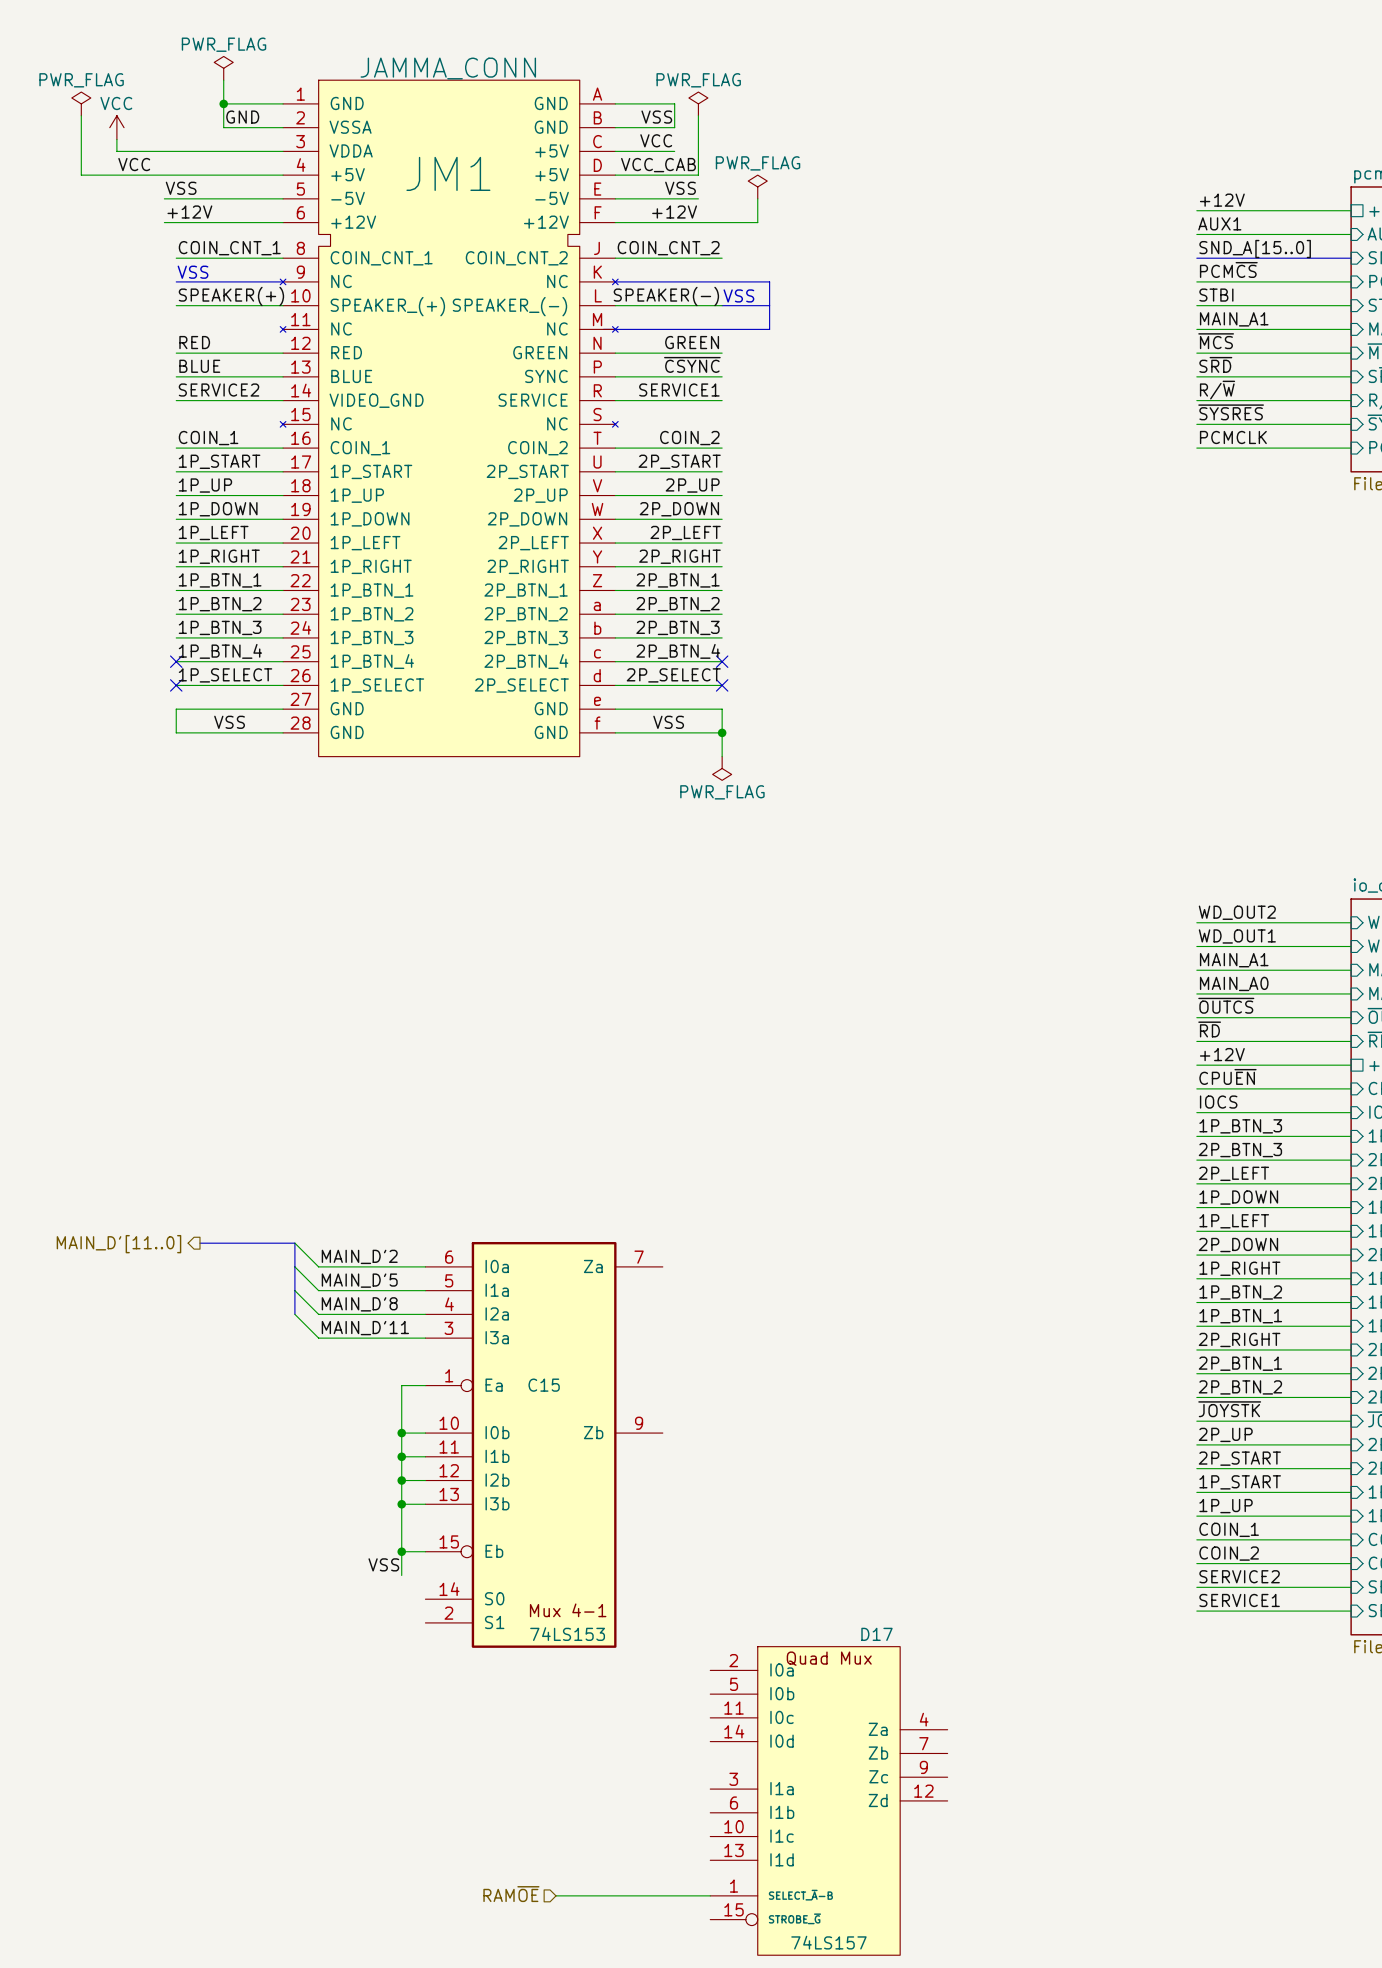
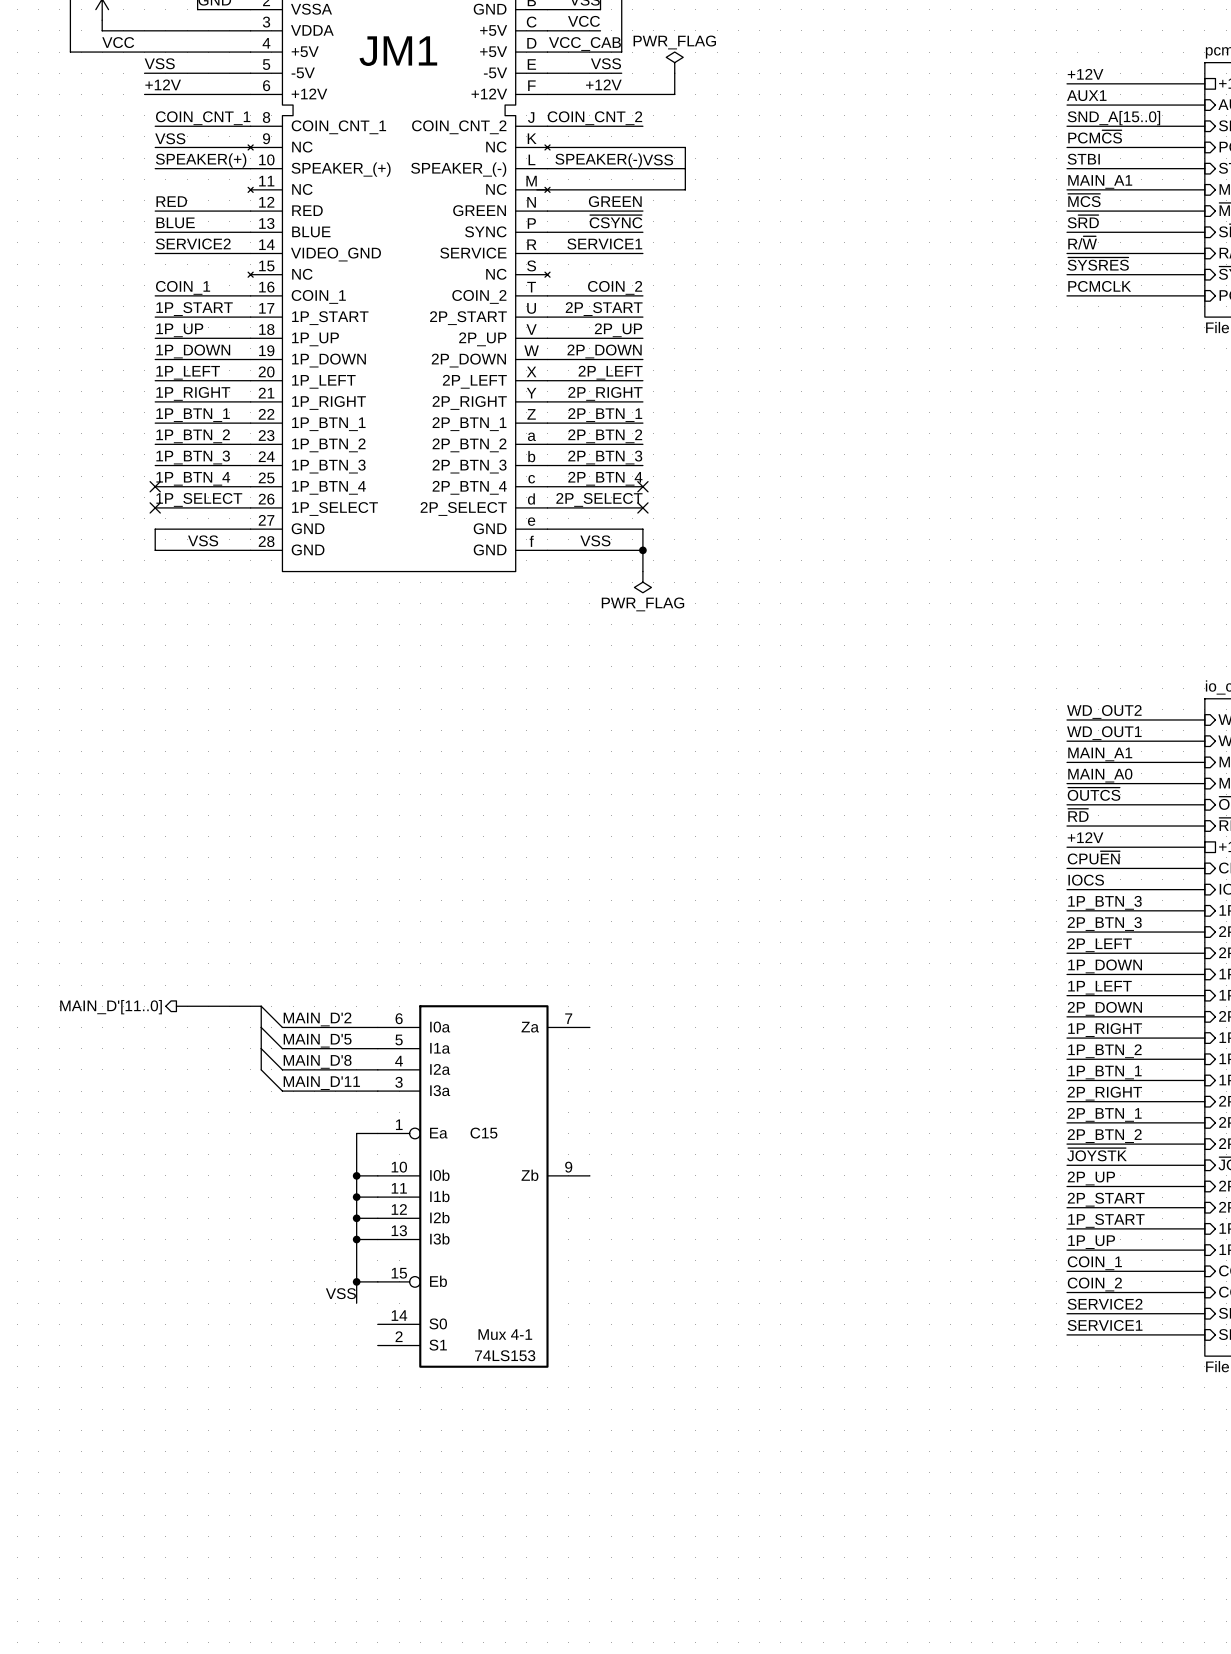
D17: 74LS157 (828, 1800) -> none
hierarchical label: RAM~{OE} (511, 1894) -> none
wire: (556, 1895) (710, 1895) -> none

